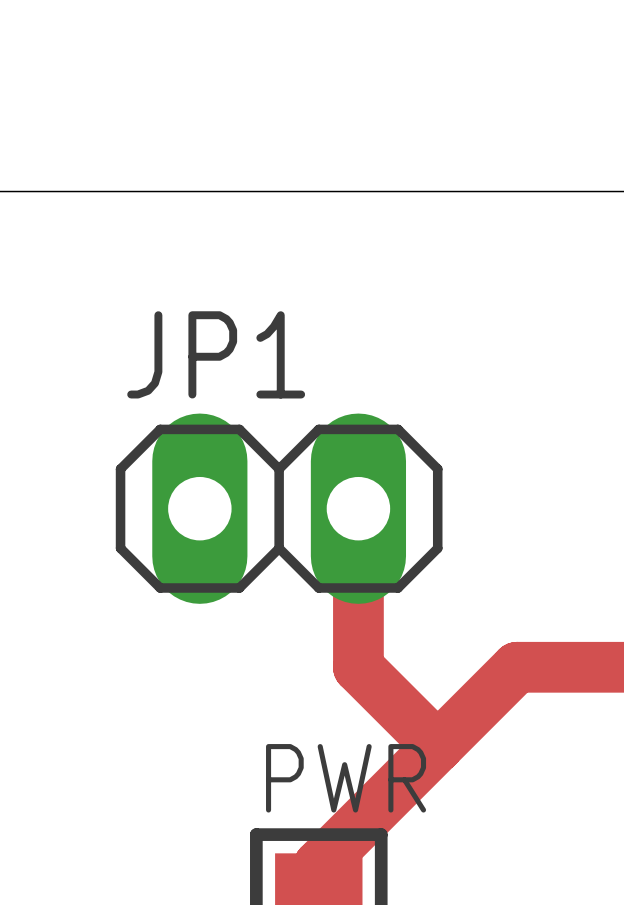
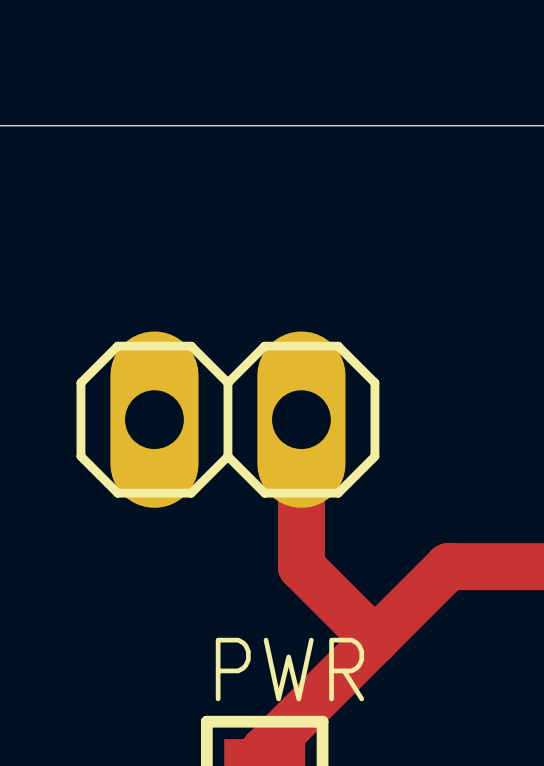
JP1 name: JP1 (216, 354) -> none

